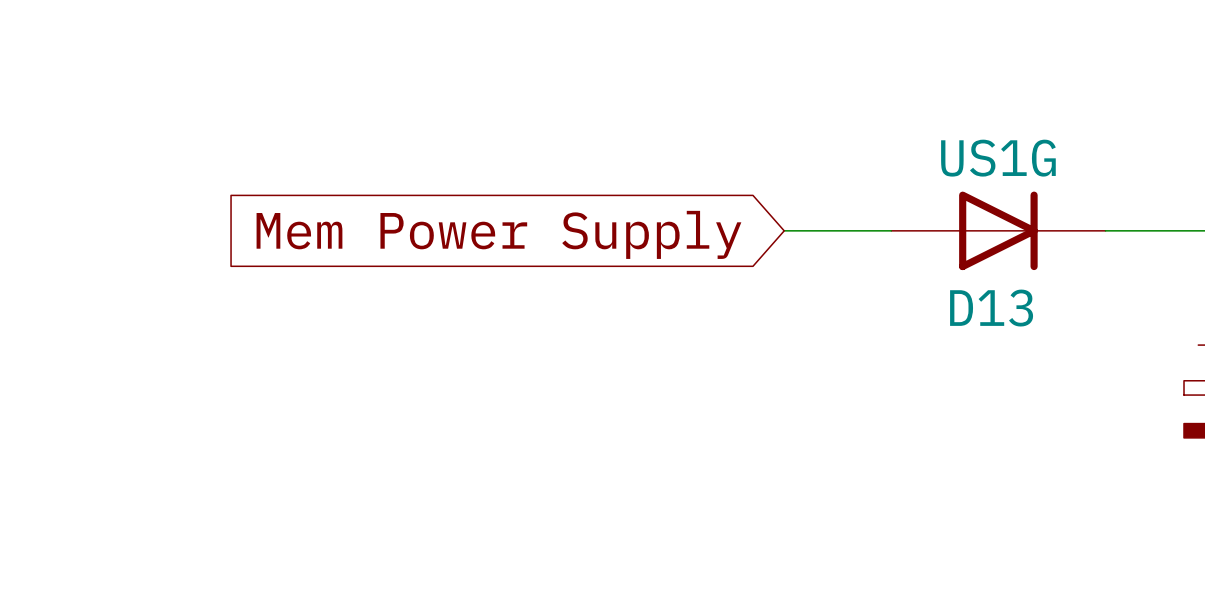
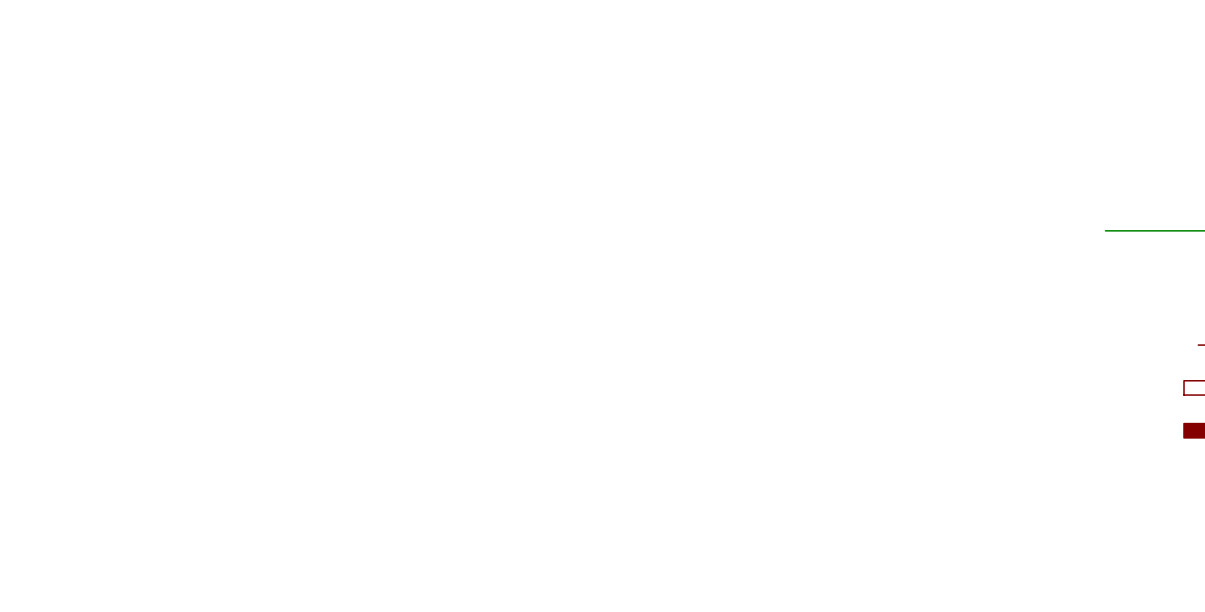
wire: (784, 230) (891, 230) -> none
D13: US1G (998, 230) -> none
global label: Mem Power Supply (498, 234) -> none

